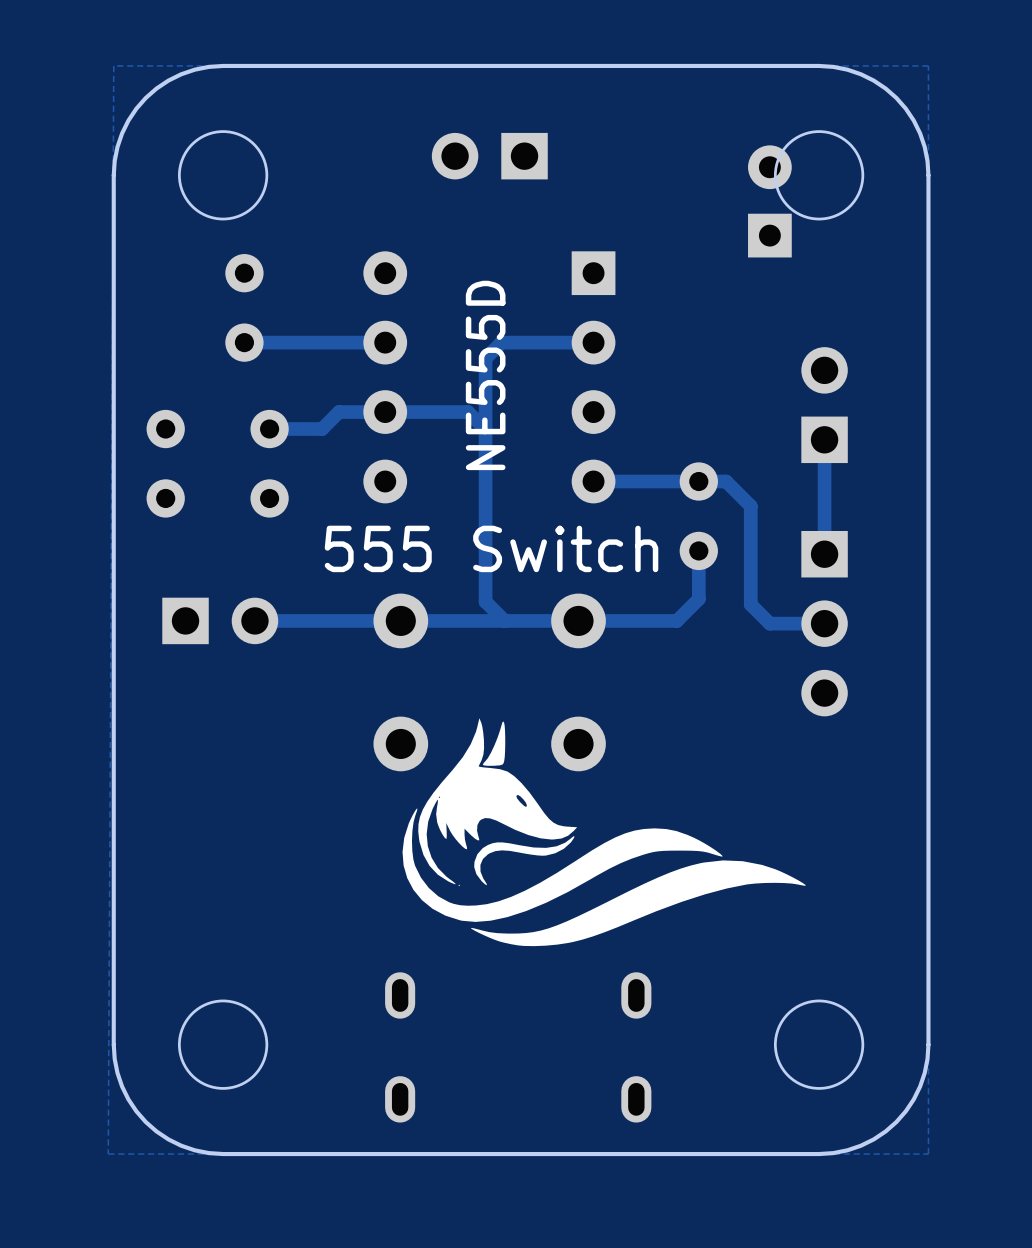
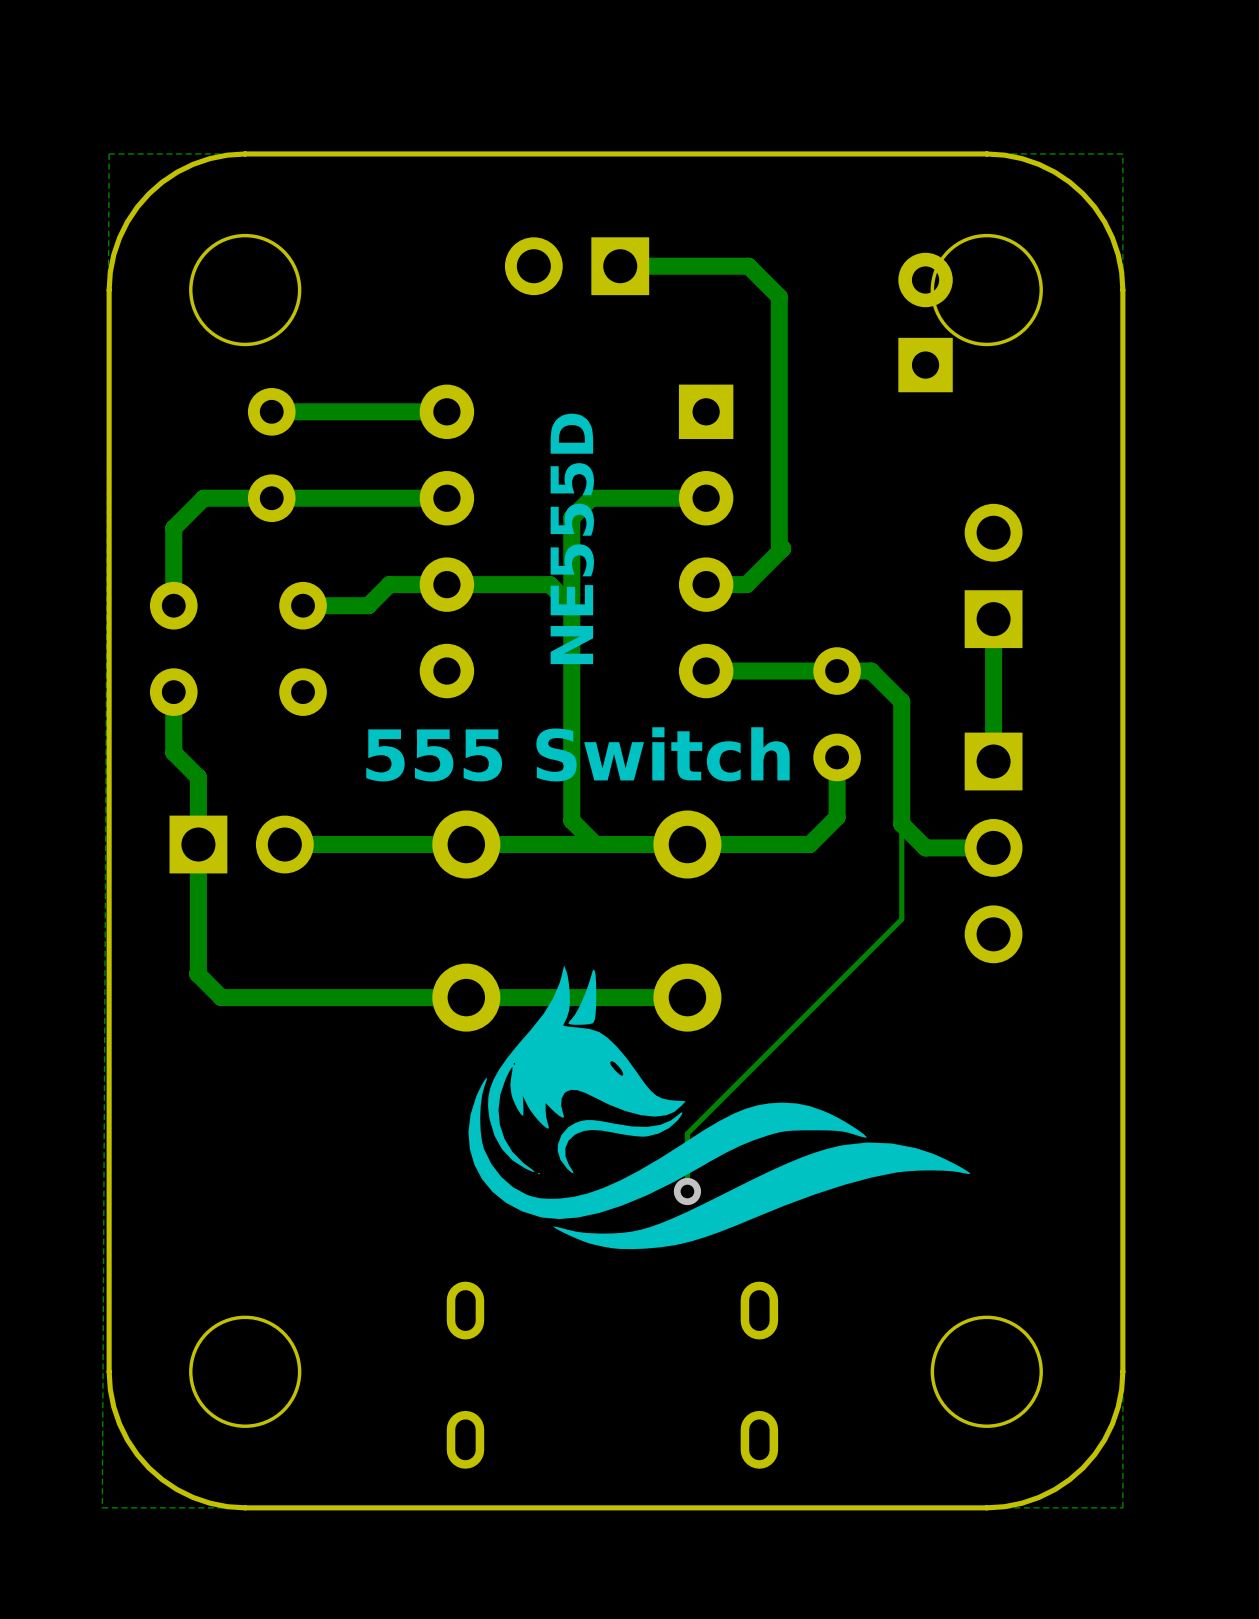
track: none -> (620, 266) (748, 266) (779, 296) (779, 545) (782, 548) (746, 584) (706, 584)
track: none -> (446, 411) (271, 411)
track: none -> (271, 498) (203, 498) (173, 528) (173, 605)
track: none -> (173, 692) (173, 752) (198, 777) (197, 973) (221, 997) (687, 997)
track: none -> (901, 824) (901, 919) (687, 1133) (687, 1191)
via: none -> (687, 1191)

